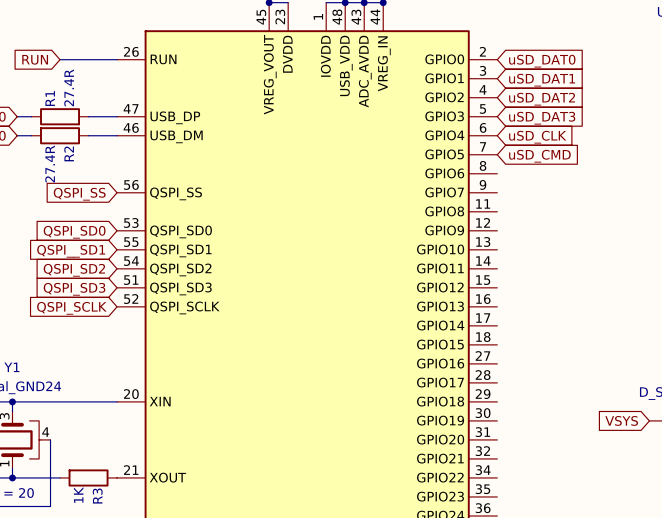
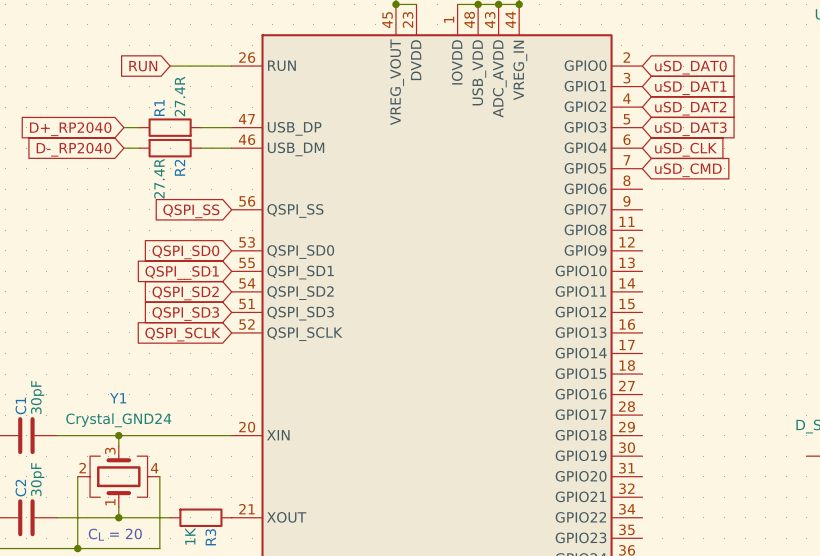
global label: VSYS (621, 420) -> none

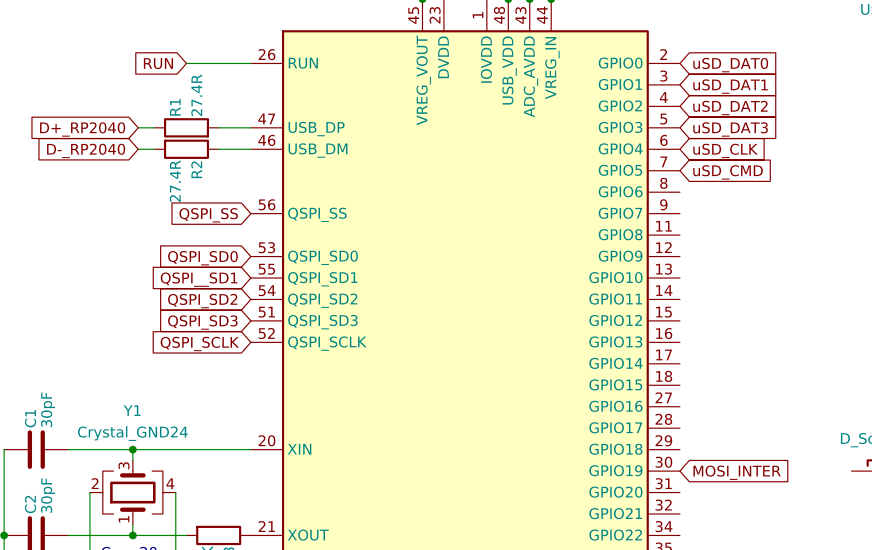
global label: none -> MOSI_INTER (737, 472)

